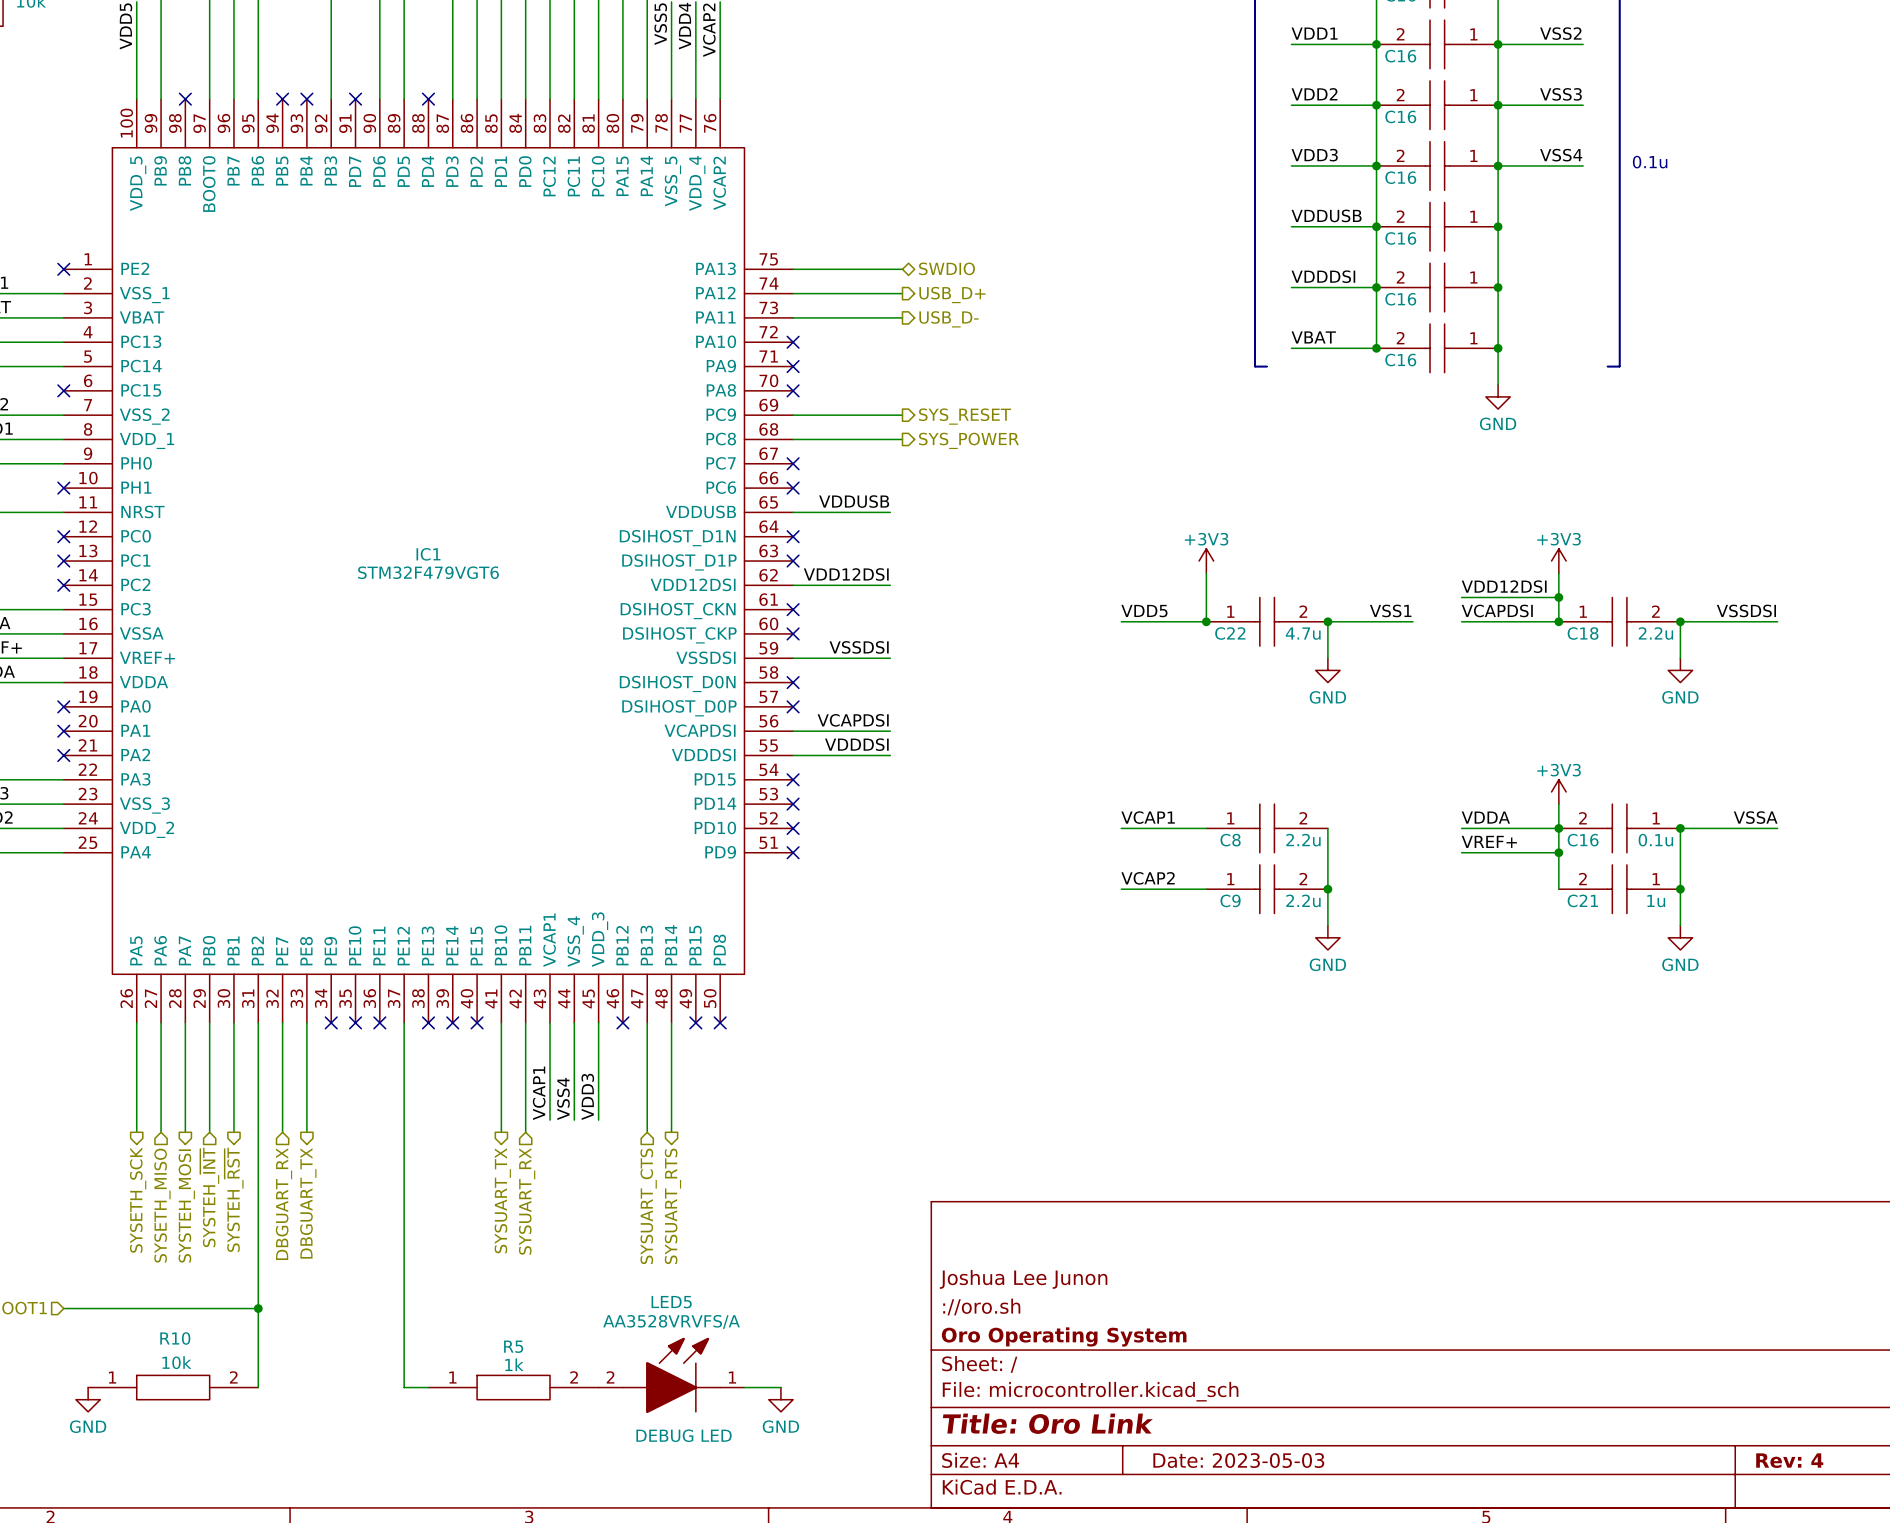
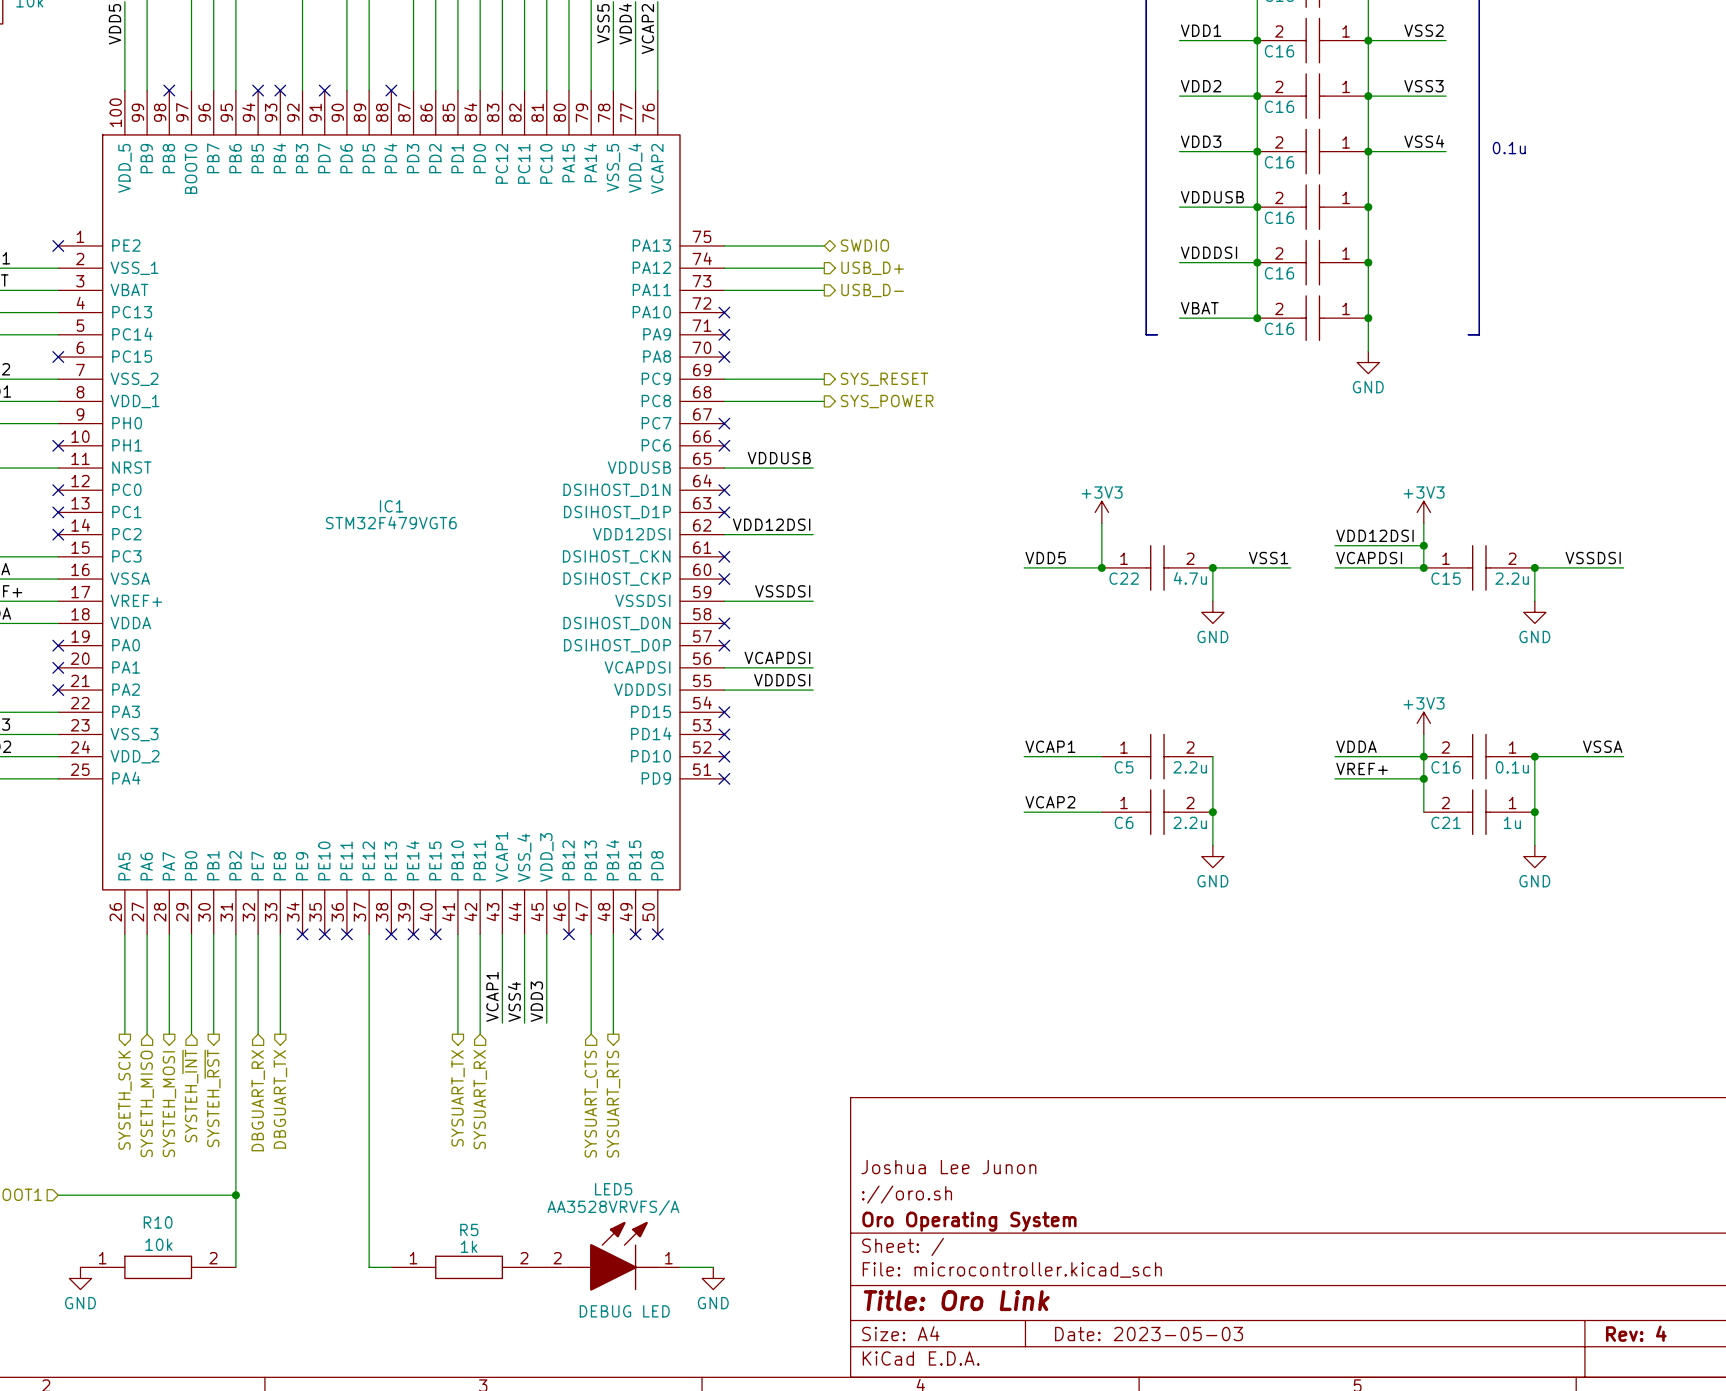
C18 name: C18 (1583, 633) -> C15 (1446, 578)
C8 name: C8 (1230, 840) -> C5 (1124, 767)
C9 name: C9 (1230, 900) -> C6 (1124, 822)

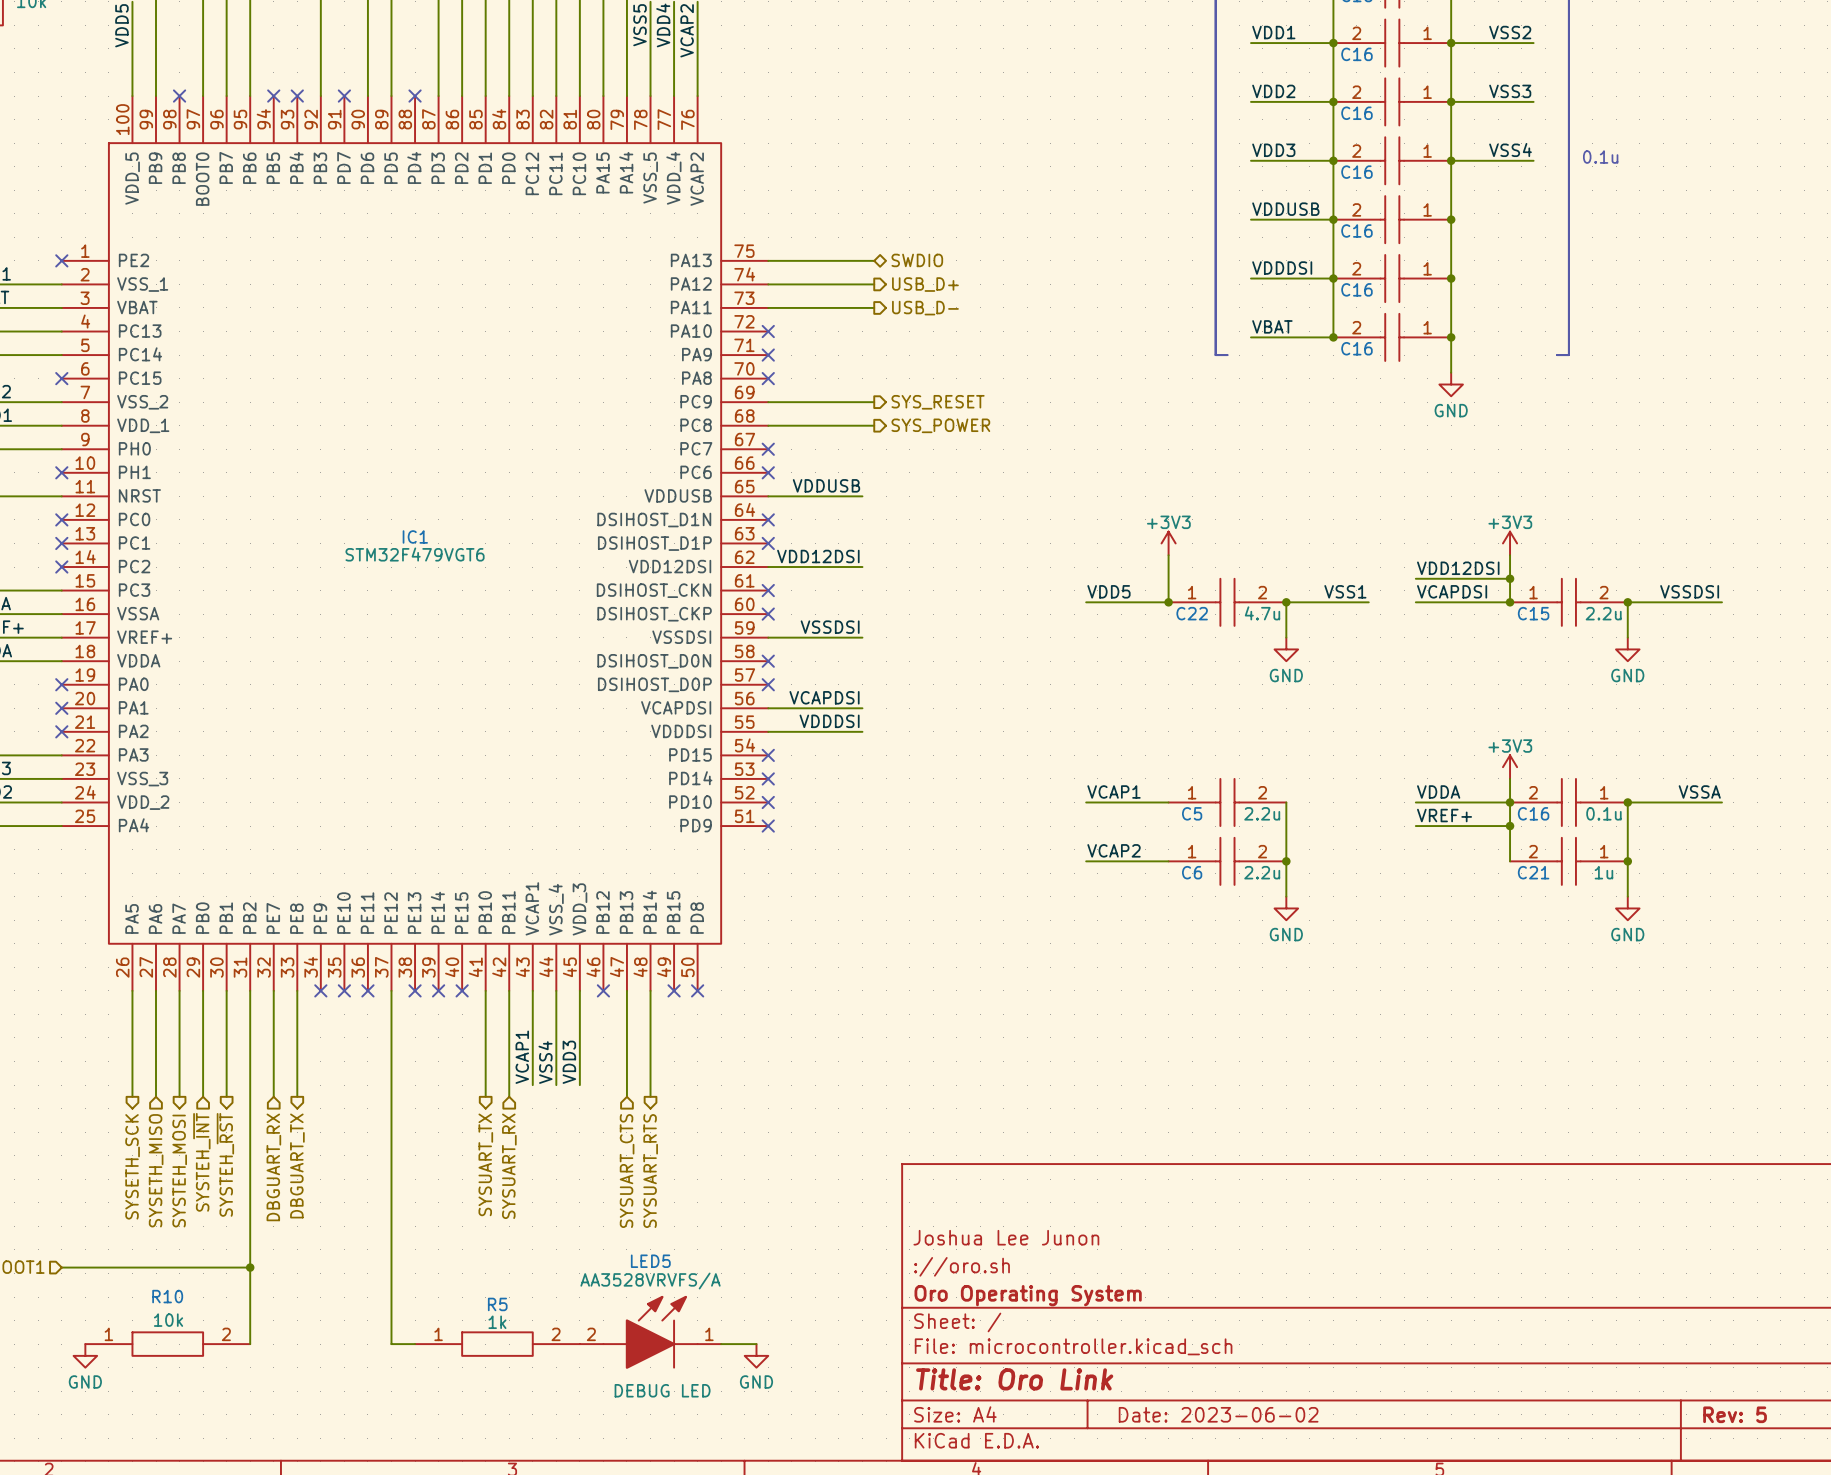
title block: Rev: 4 (1636, 1333) -> Rev: 5 (1735, 1414)
title block: Date: 2023-05-03 (1149, 1334) -> Date: 2023-06-02 (1218, 1414)

